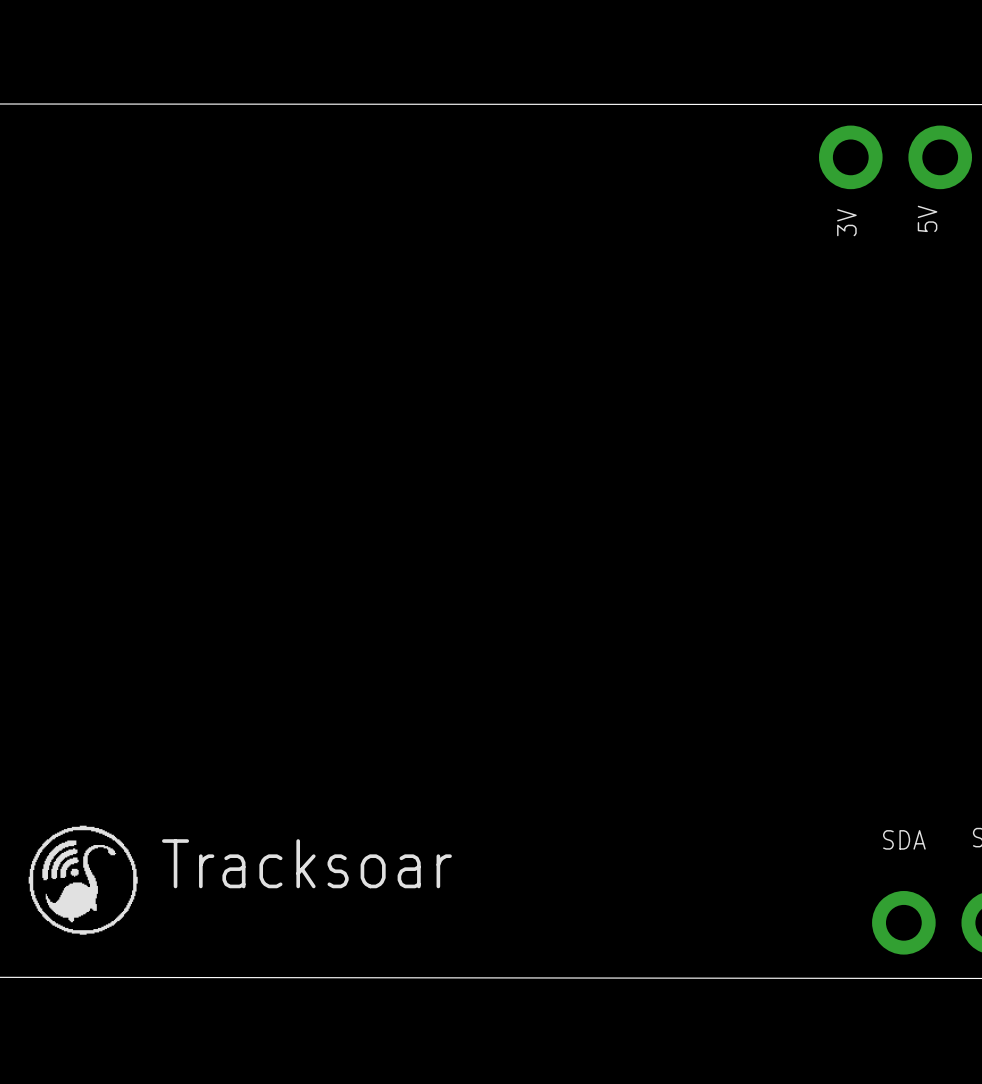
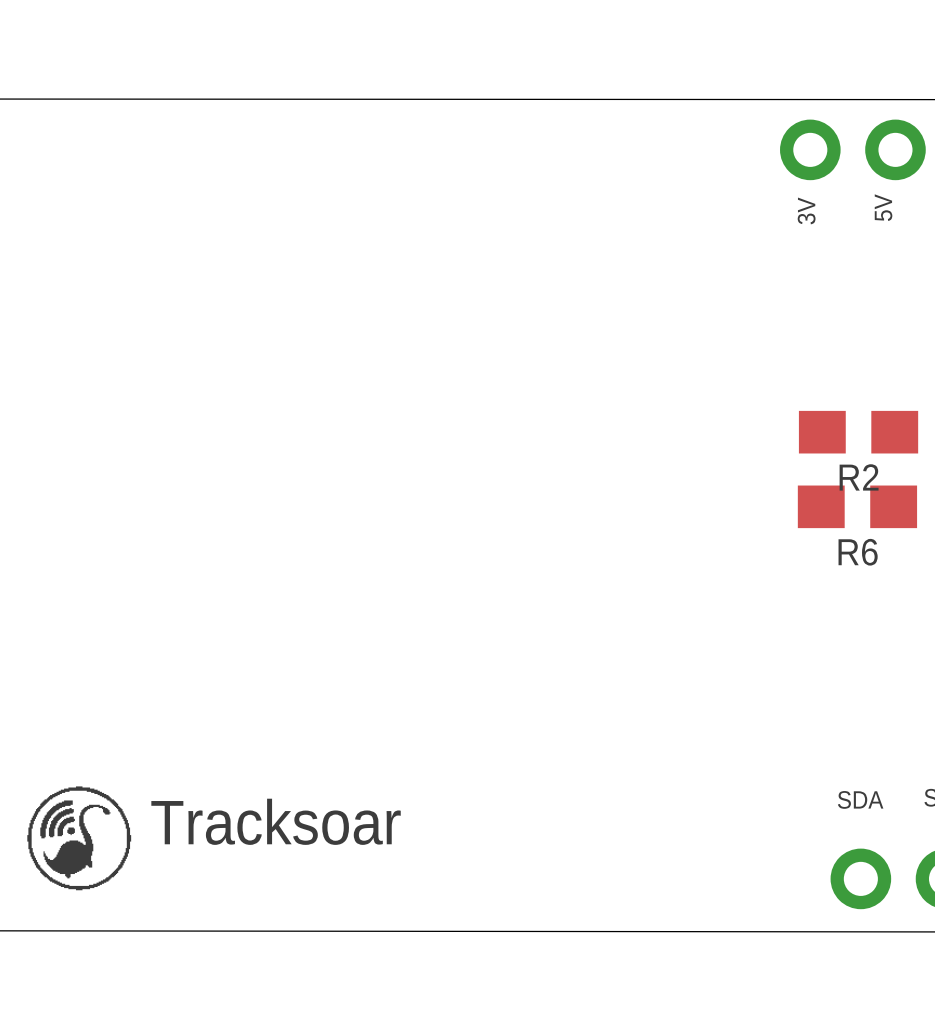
R2: none -> (858, 432)
R6: none -> (857, 506)

